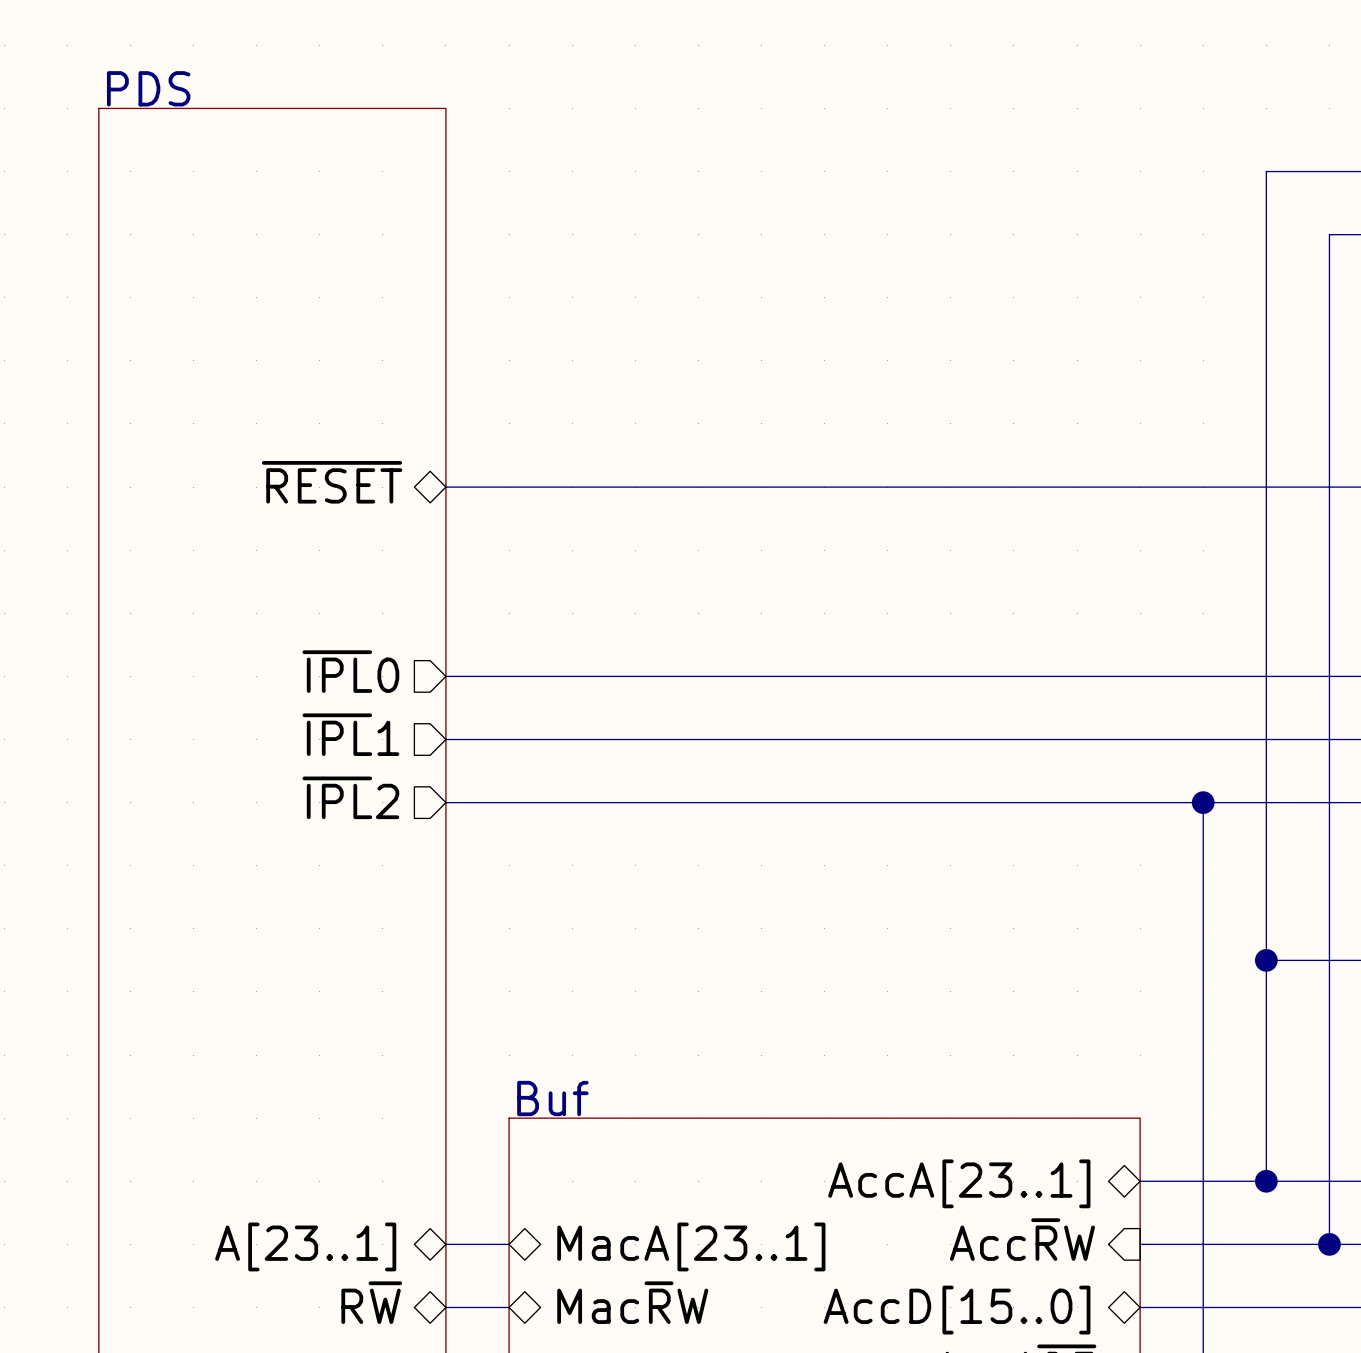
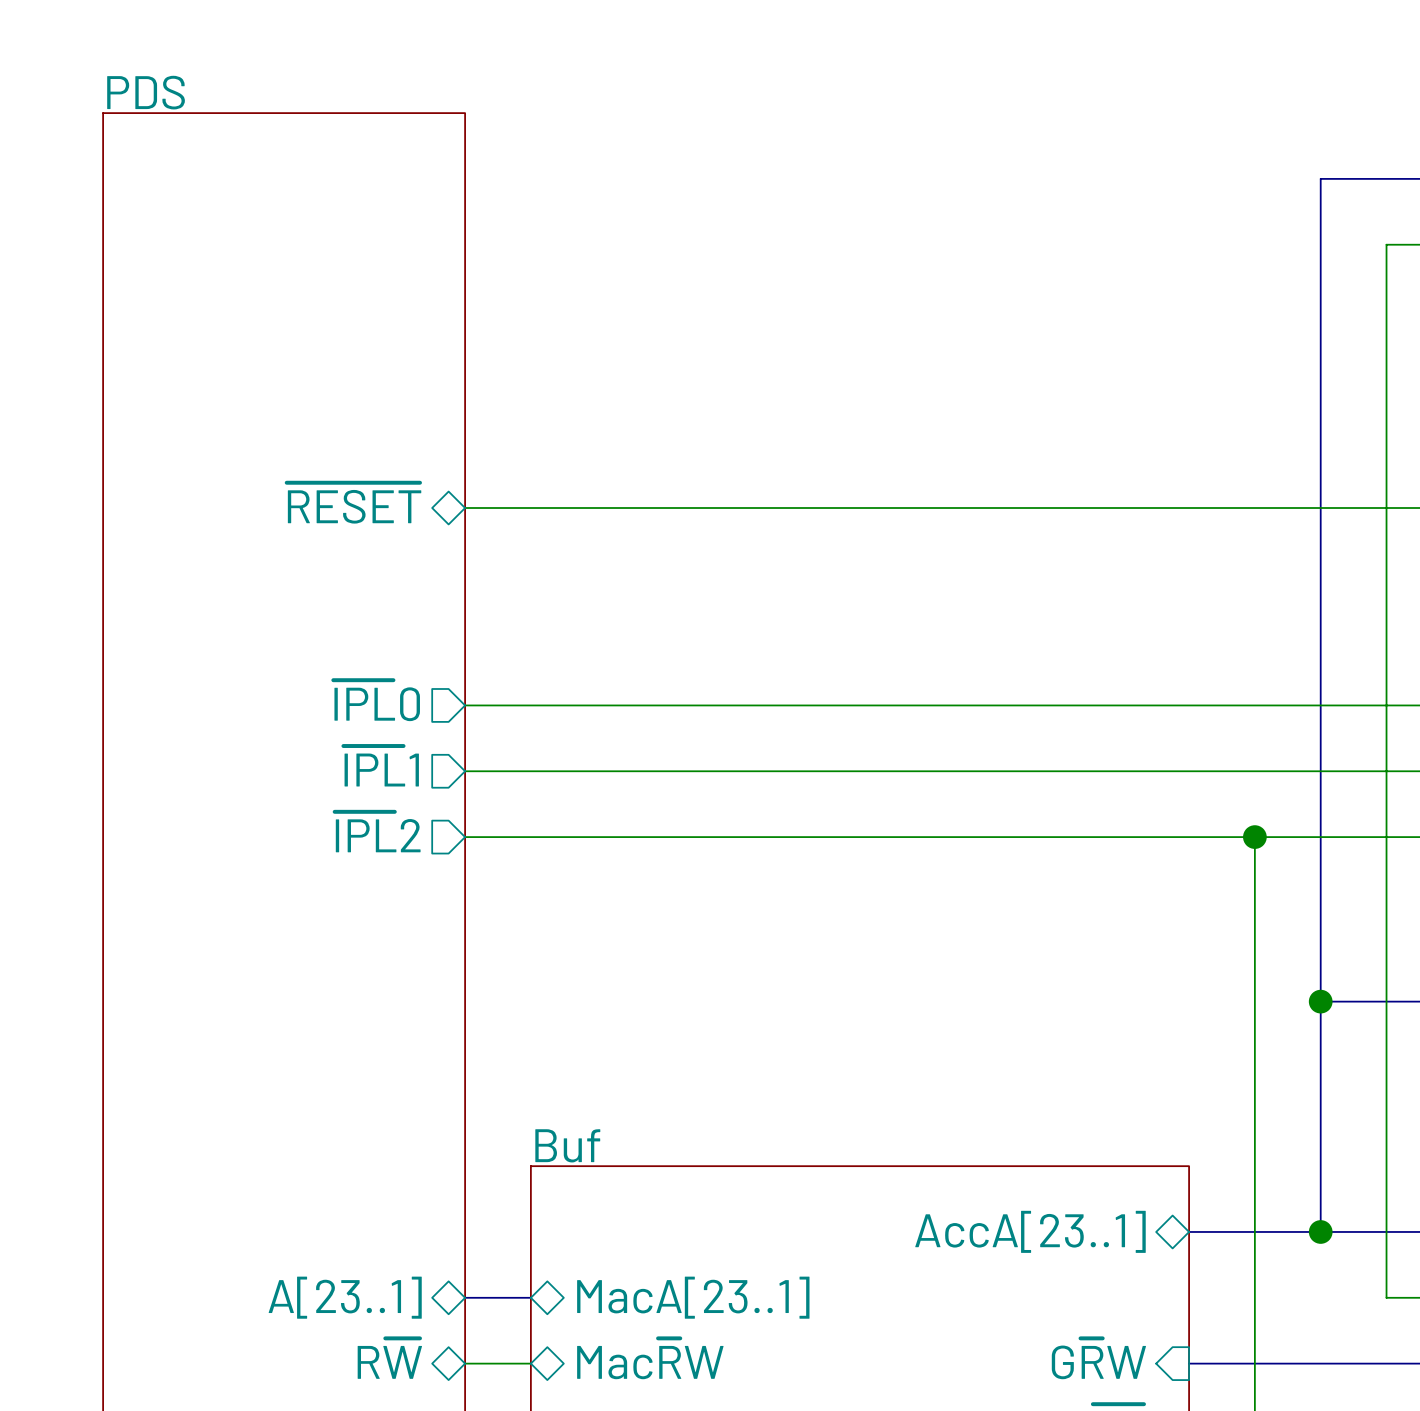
sheet pin: Acc~{R}W (1022, 1239) -> none
wire: (1140, 1244) (1329, 1244) -> none
junction: (1329, 1244) -> none
sheet pin shape: bidirectional (957, 1310) -> input (1098, 1358)
sheet pin: AccD[15..0] (957, 1310) -> G~{R}W (1098, 1358)

